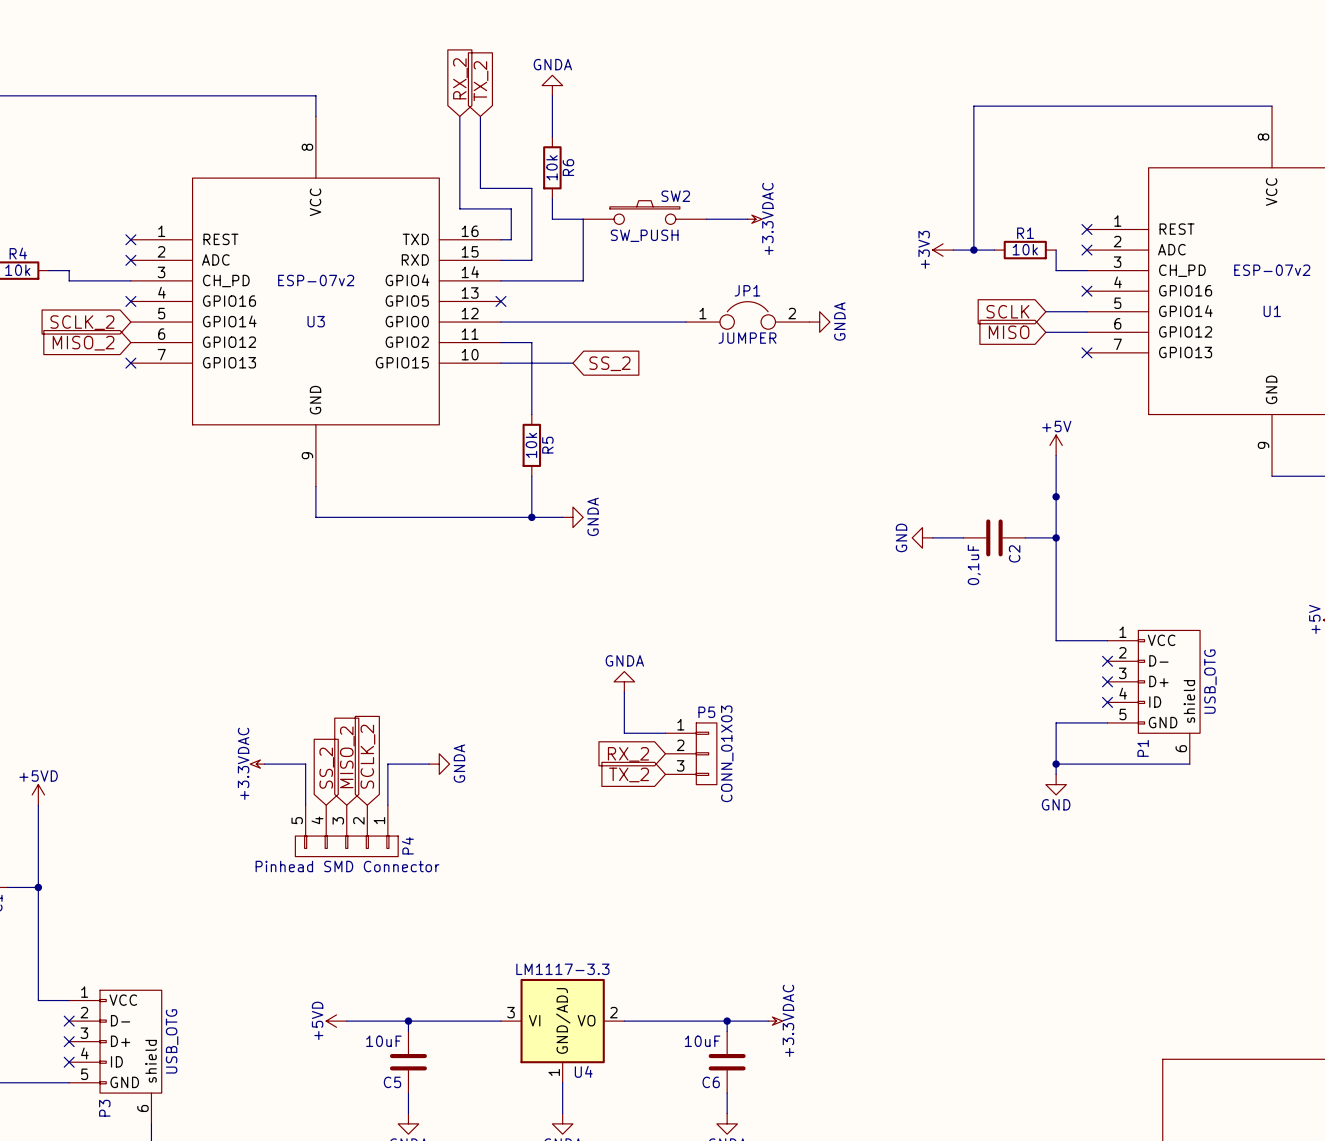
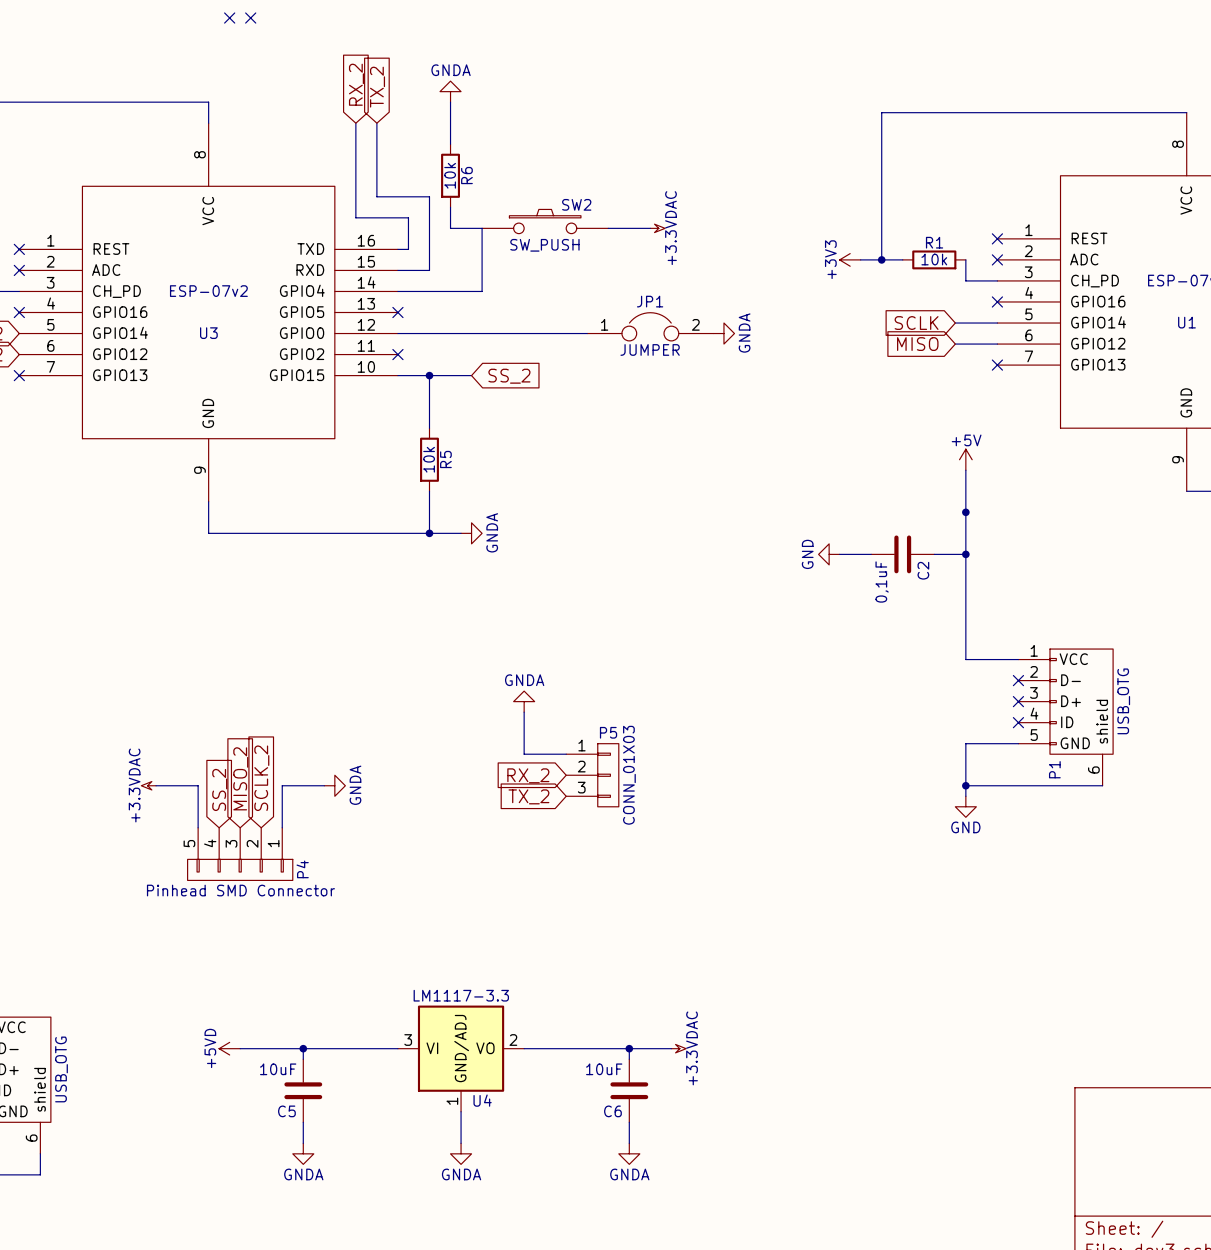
no-connect mark: none -> (229, 18)
no-connect mark: none -> (250, 18)
wire: (500, 342) (531, 342) (531, 363) -> none
no-connect mark: none -> (397, 354)
junction: none -> (429, 375)

